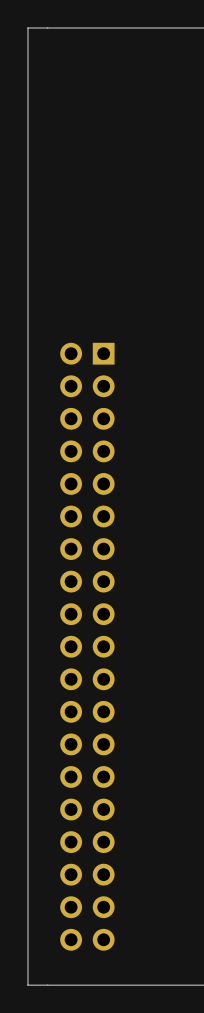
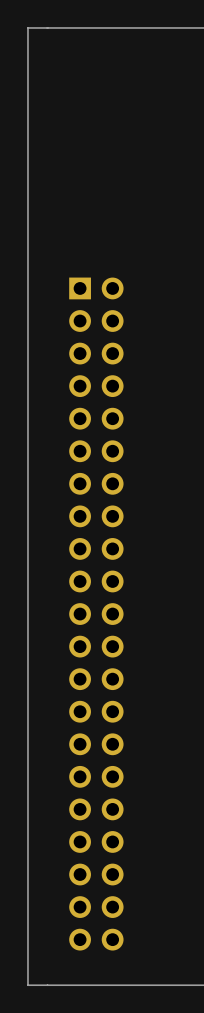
part: none -> (96, 614)
part: (87, 646) -> none

